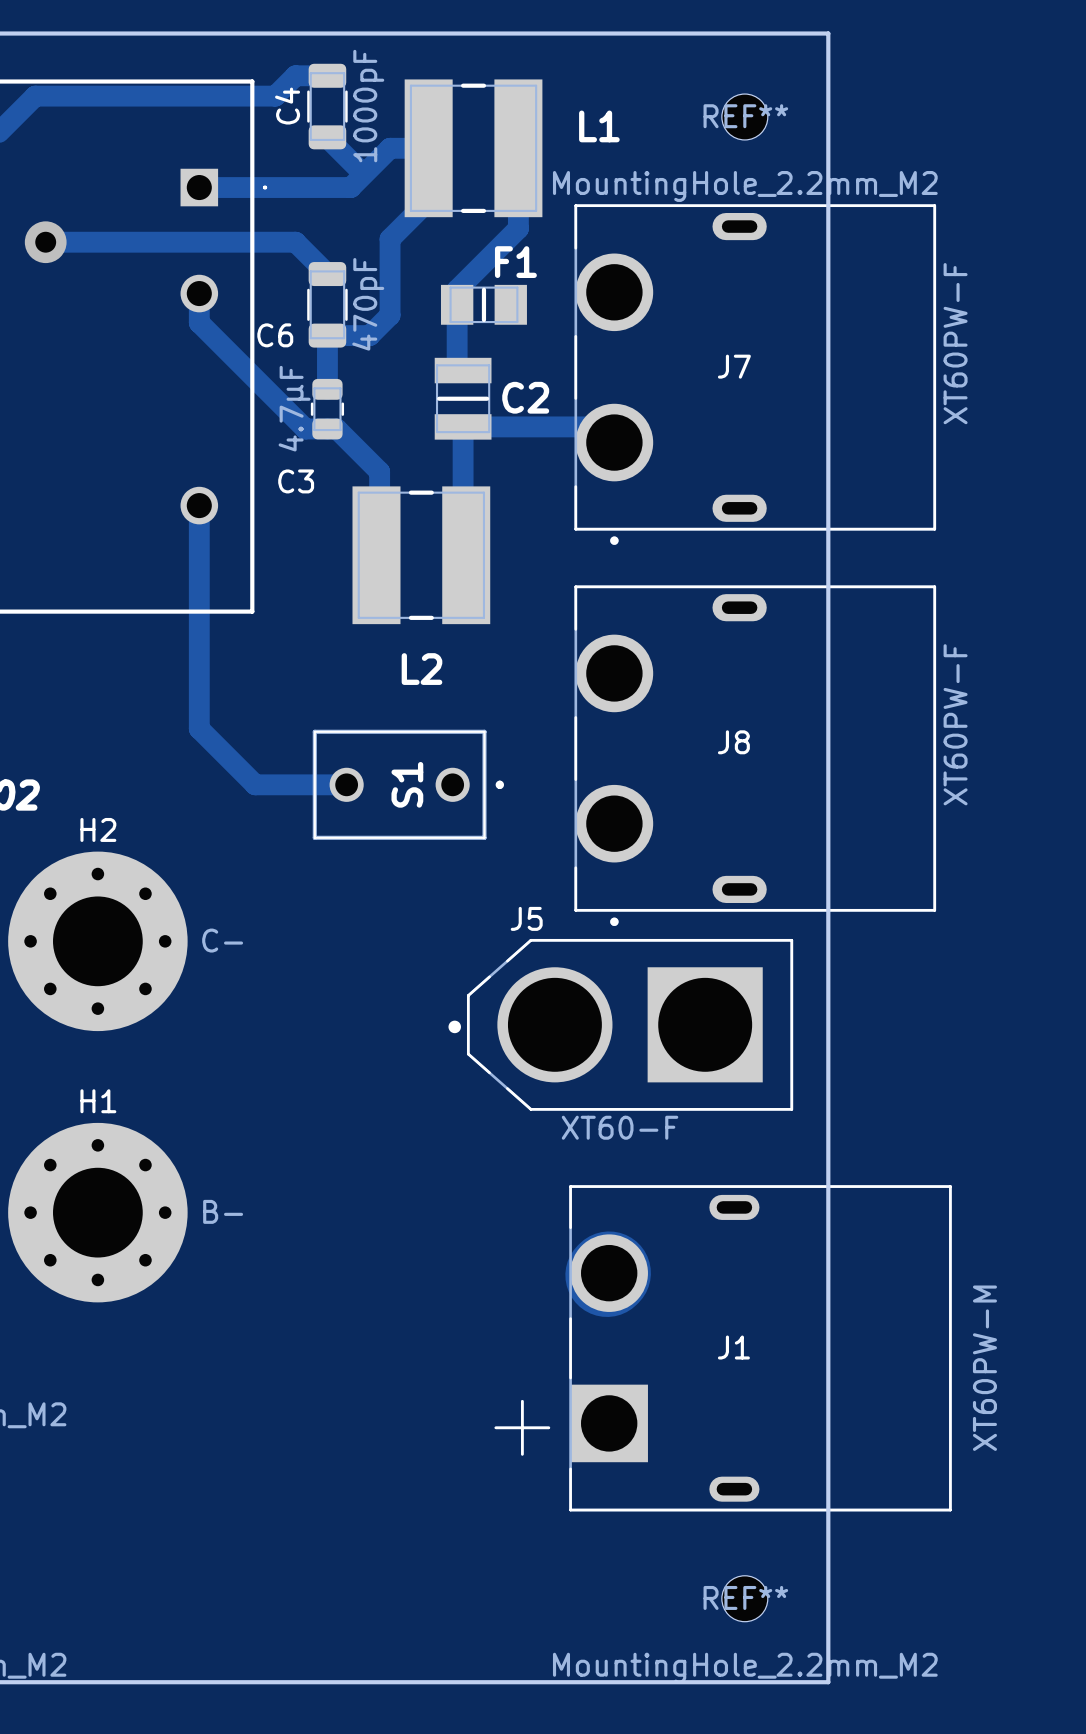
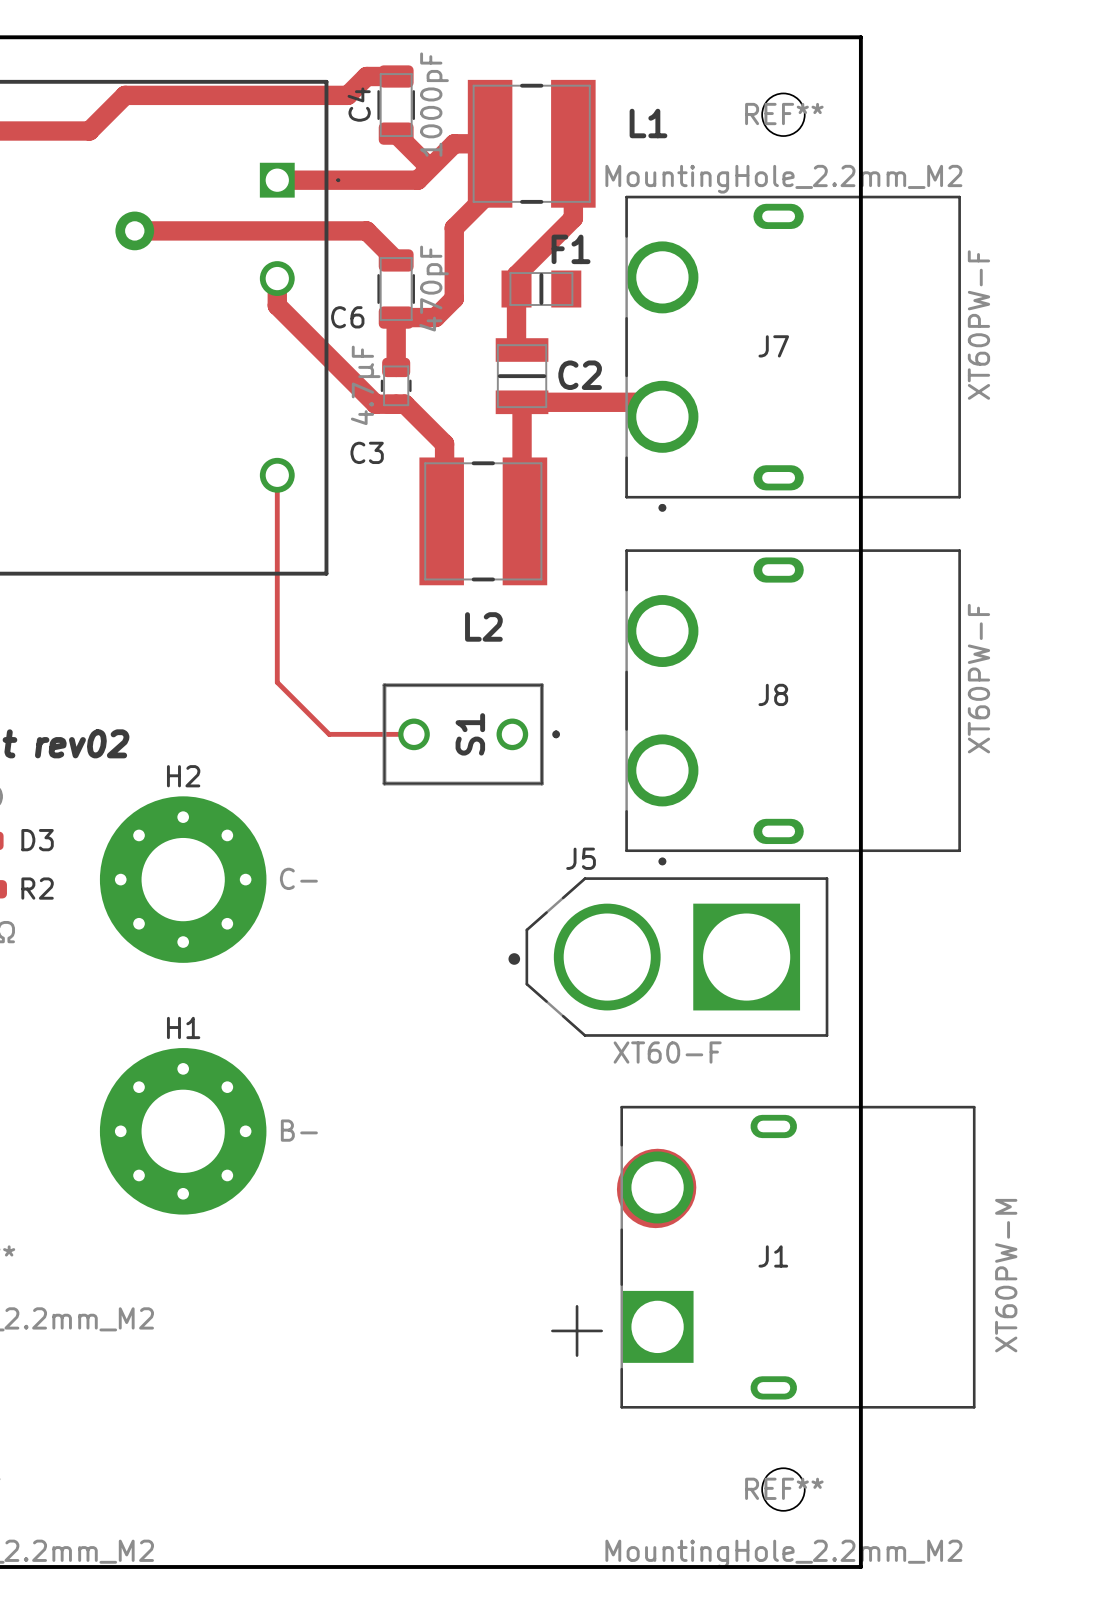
track width: thick (199, 505) (199, 728) (255, 784) (346, 784) -> thin (277, 475) (277, 682) (329, 734) (413, 734)

